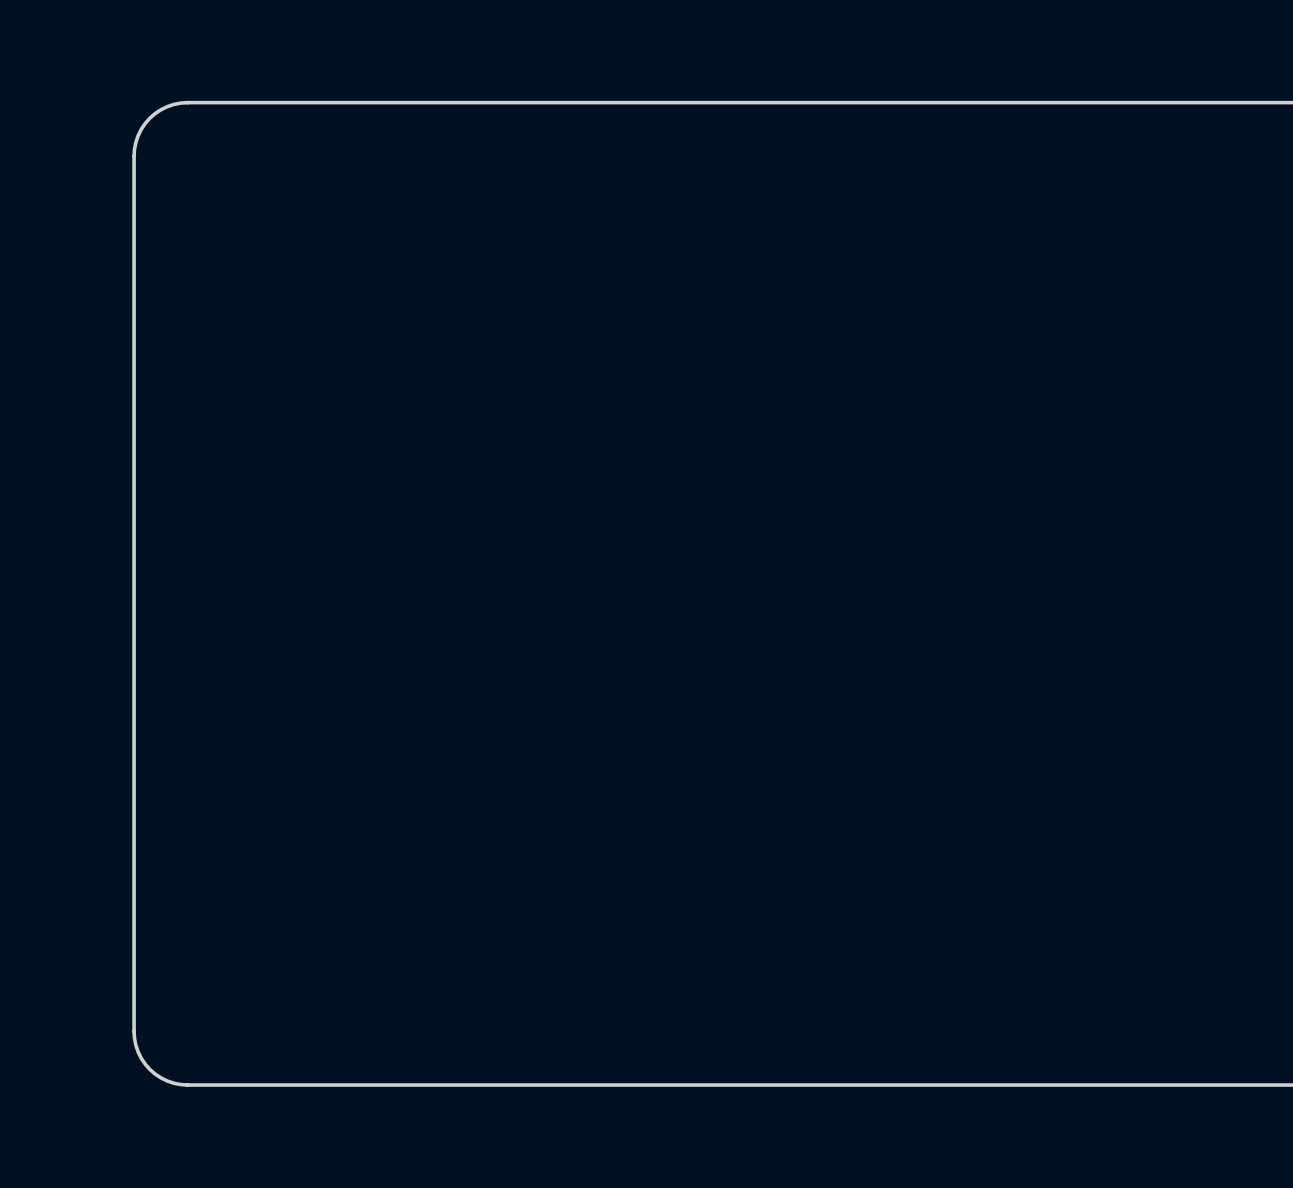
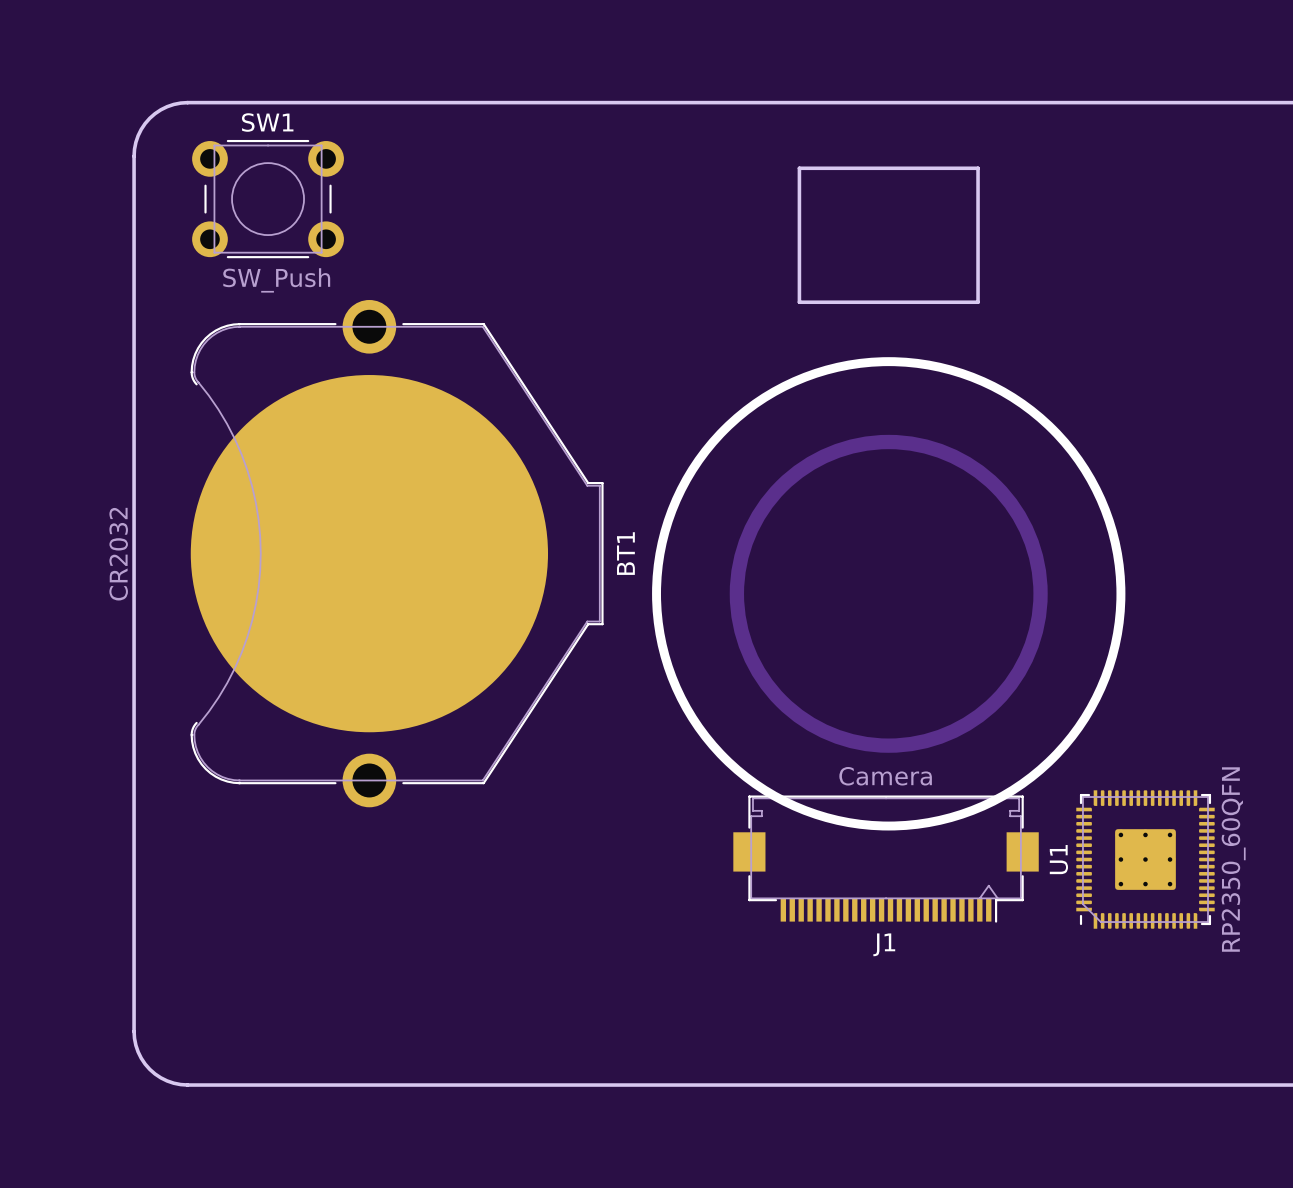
board edge: none -> (799, 168) (978, 168) (978, 302) (799, 302) (799, 168)
SW1: none -> SW_Push (268, 199)
drawing: none -> [652, 357, 1126, 831]
BT1: none -> CR2032 (397, 553)
J1: none -> Camera (886, 859)
U1: none -> RP2350_60QFN (1145, 859)

